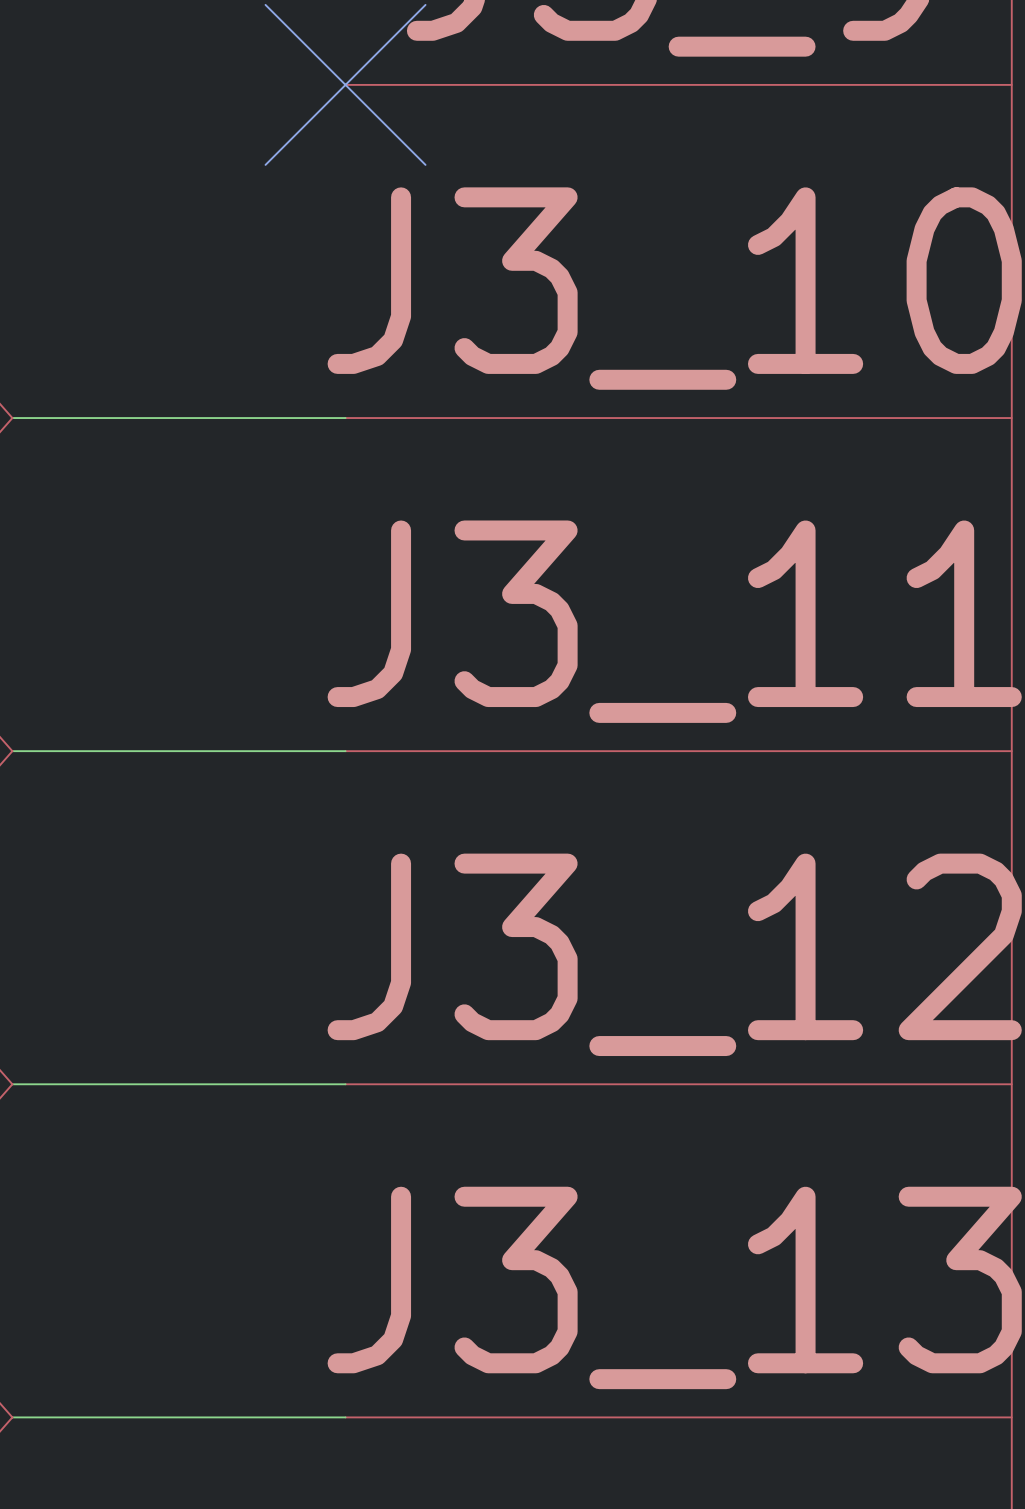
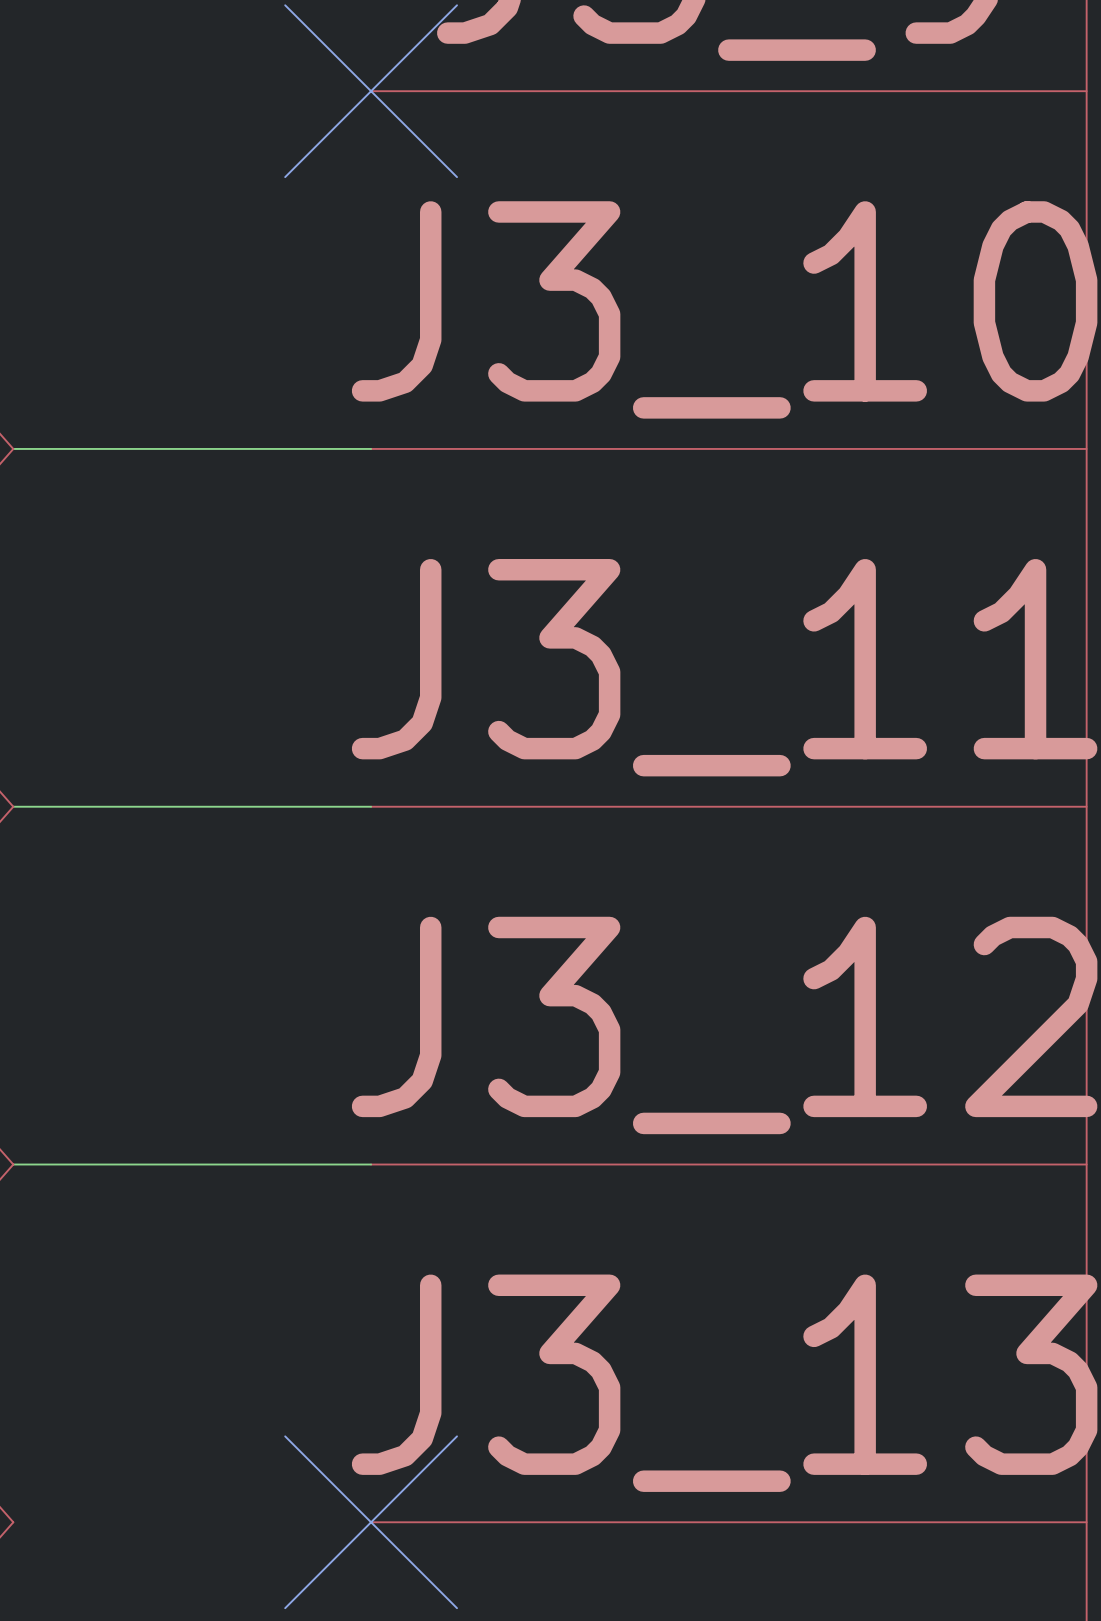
wire: (12, 1417) (345, 1417) -> none
no-connect mark: none -> (371, 1522)

